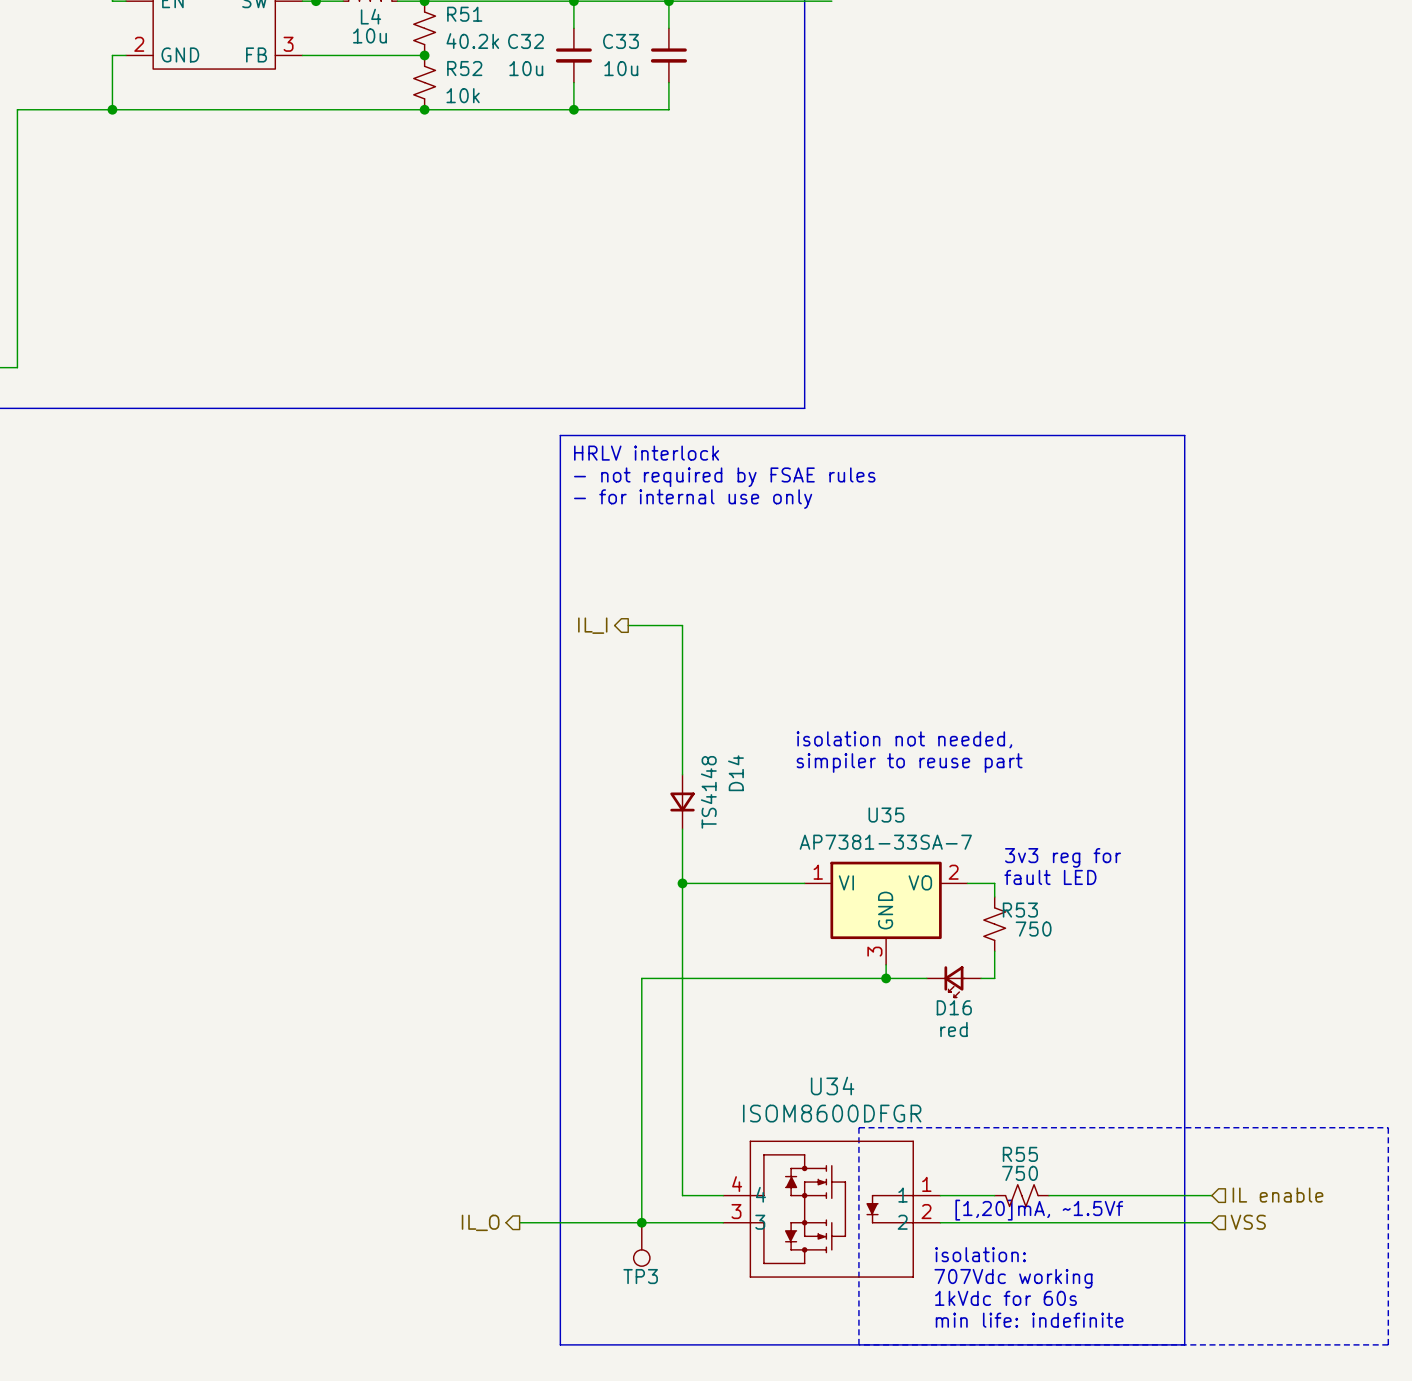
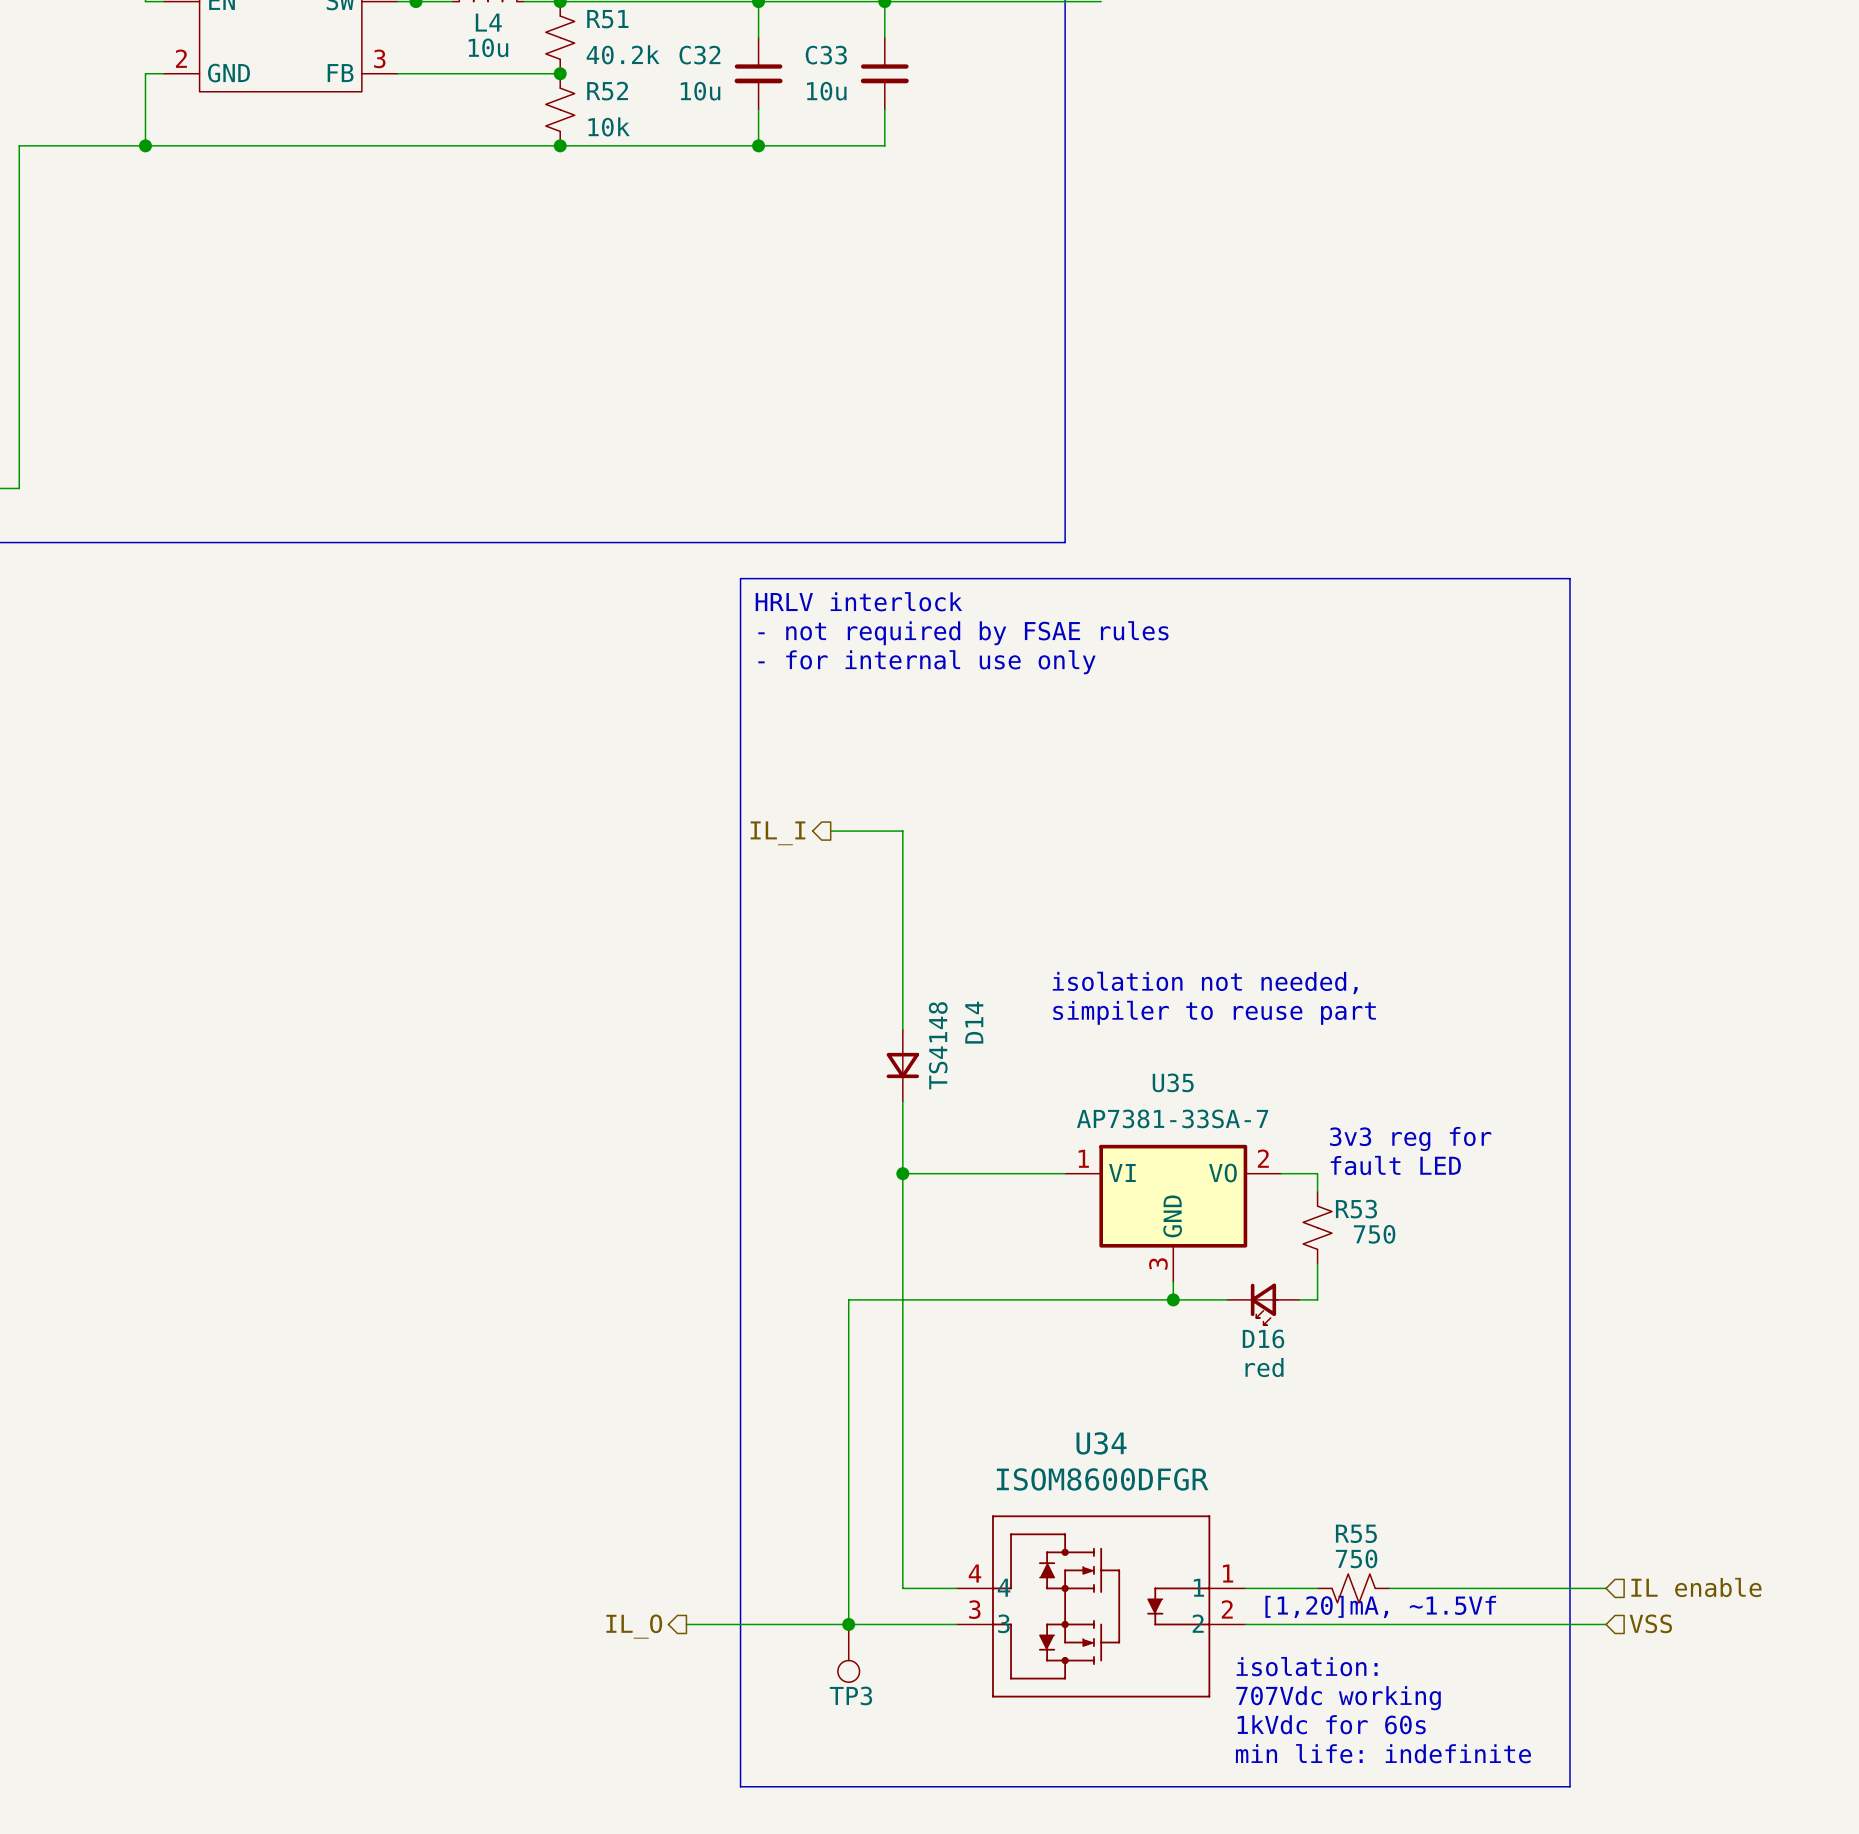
line: (858, 1127) (1388, 1127) (1388, 1344) (858, 1344) (858, 1127) -> none

